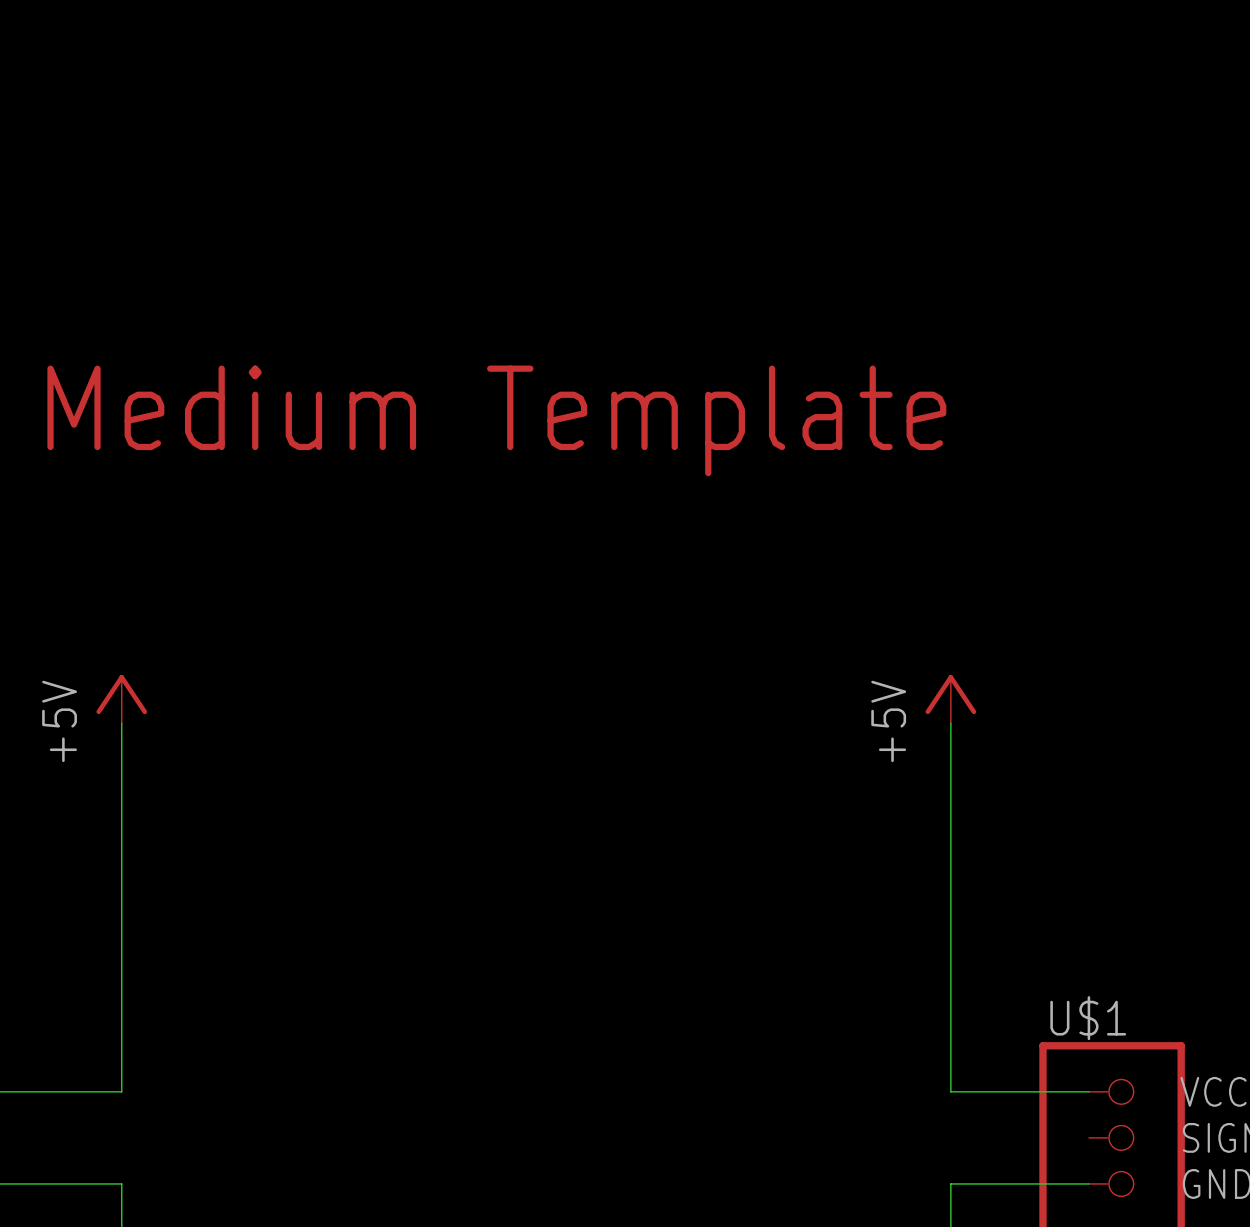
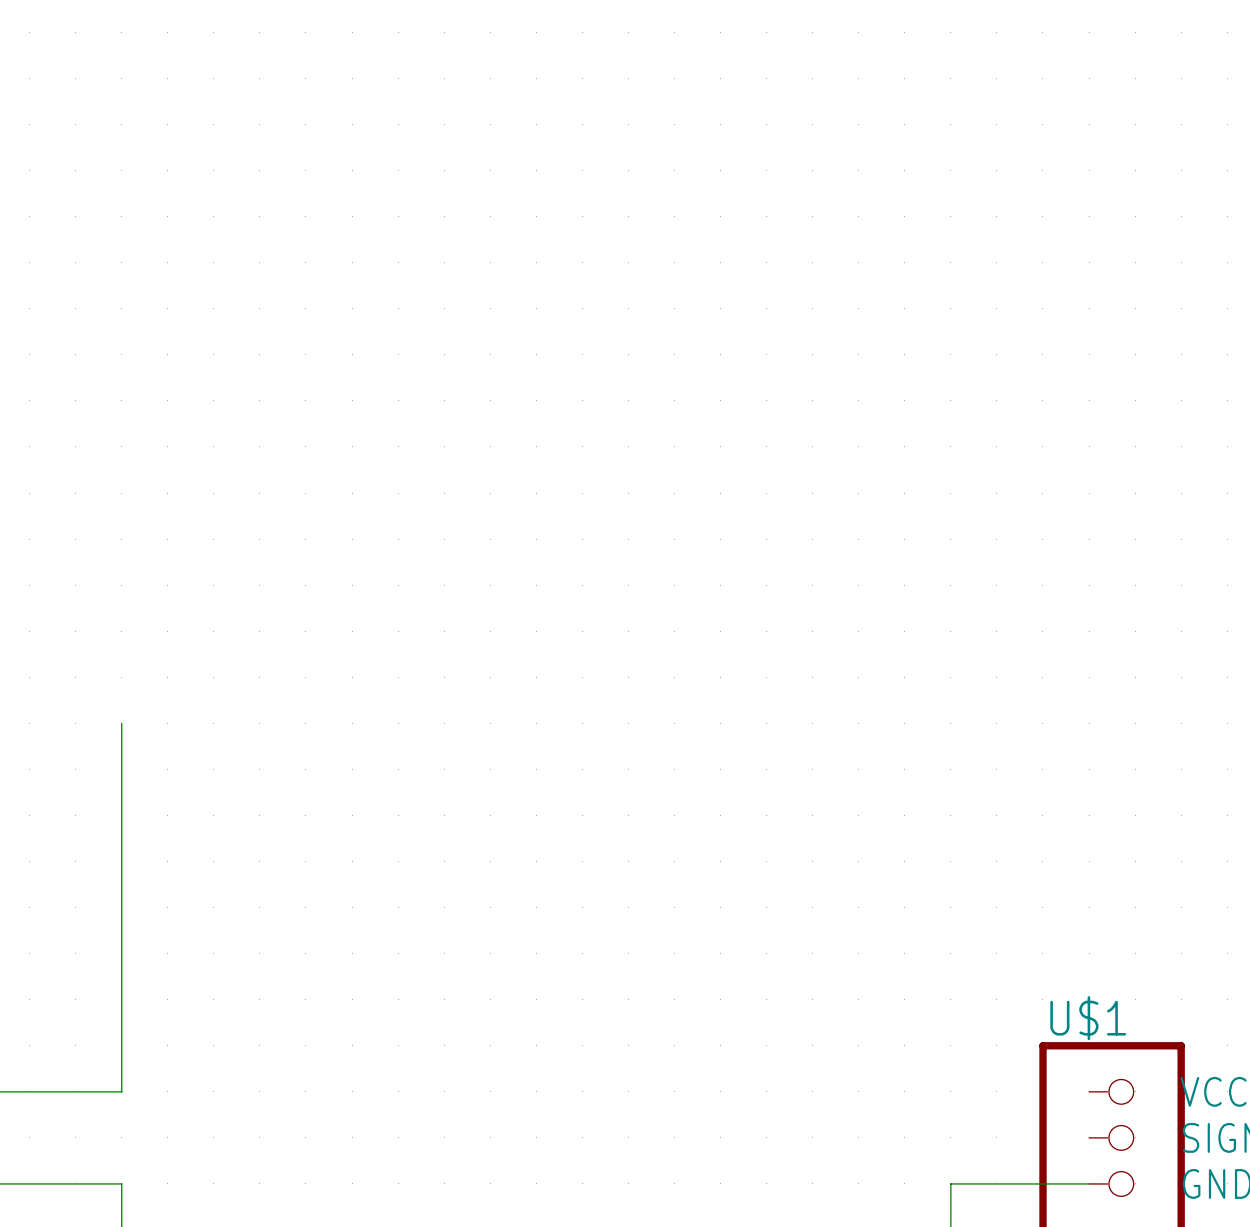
text: Medium Template (496, 420) -> none
power symbol: +5V (121, 699) -> none
power symbol: +5V (950, 699) -> none
wire: (950, 723) (950, 1091) (1089, 1091) -> none

